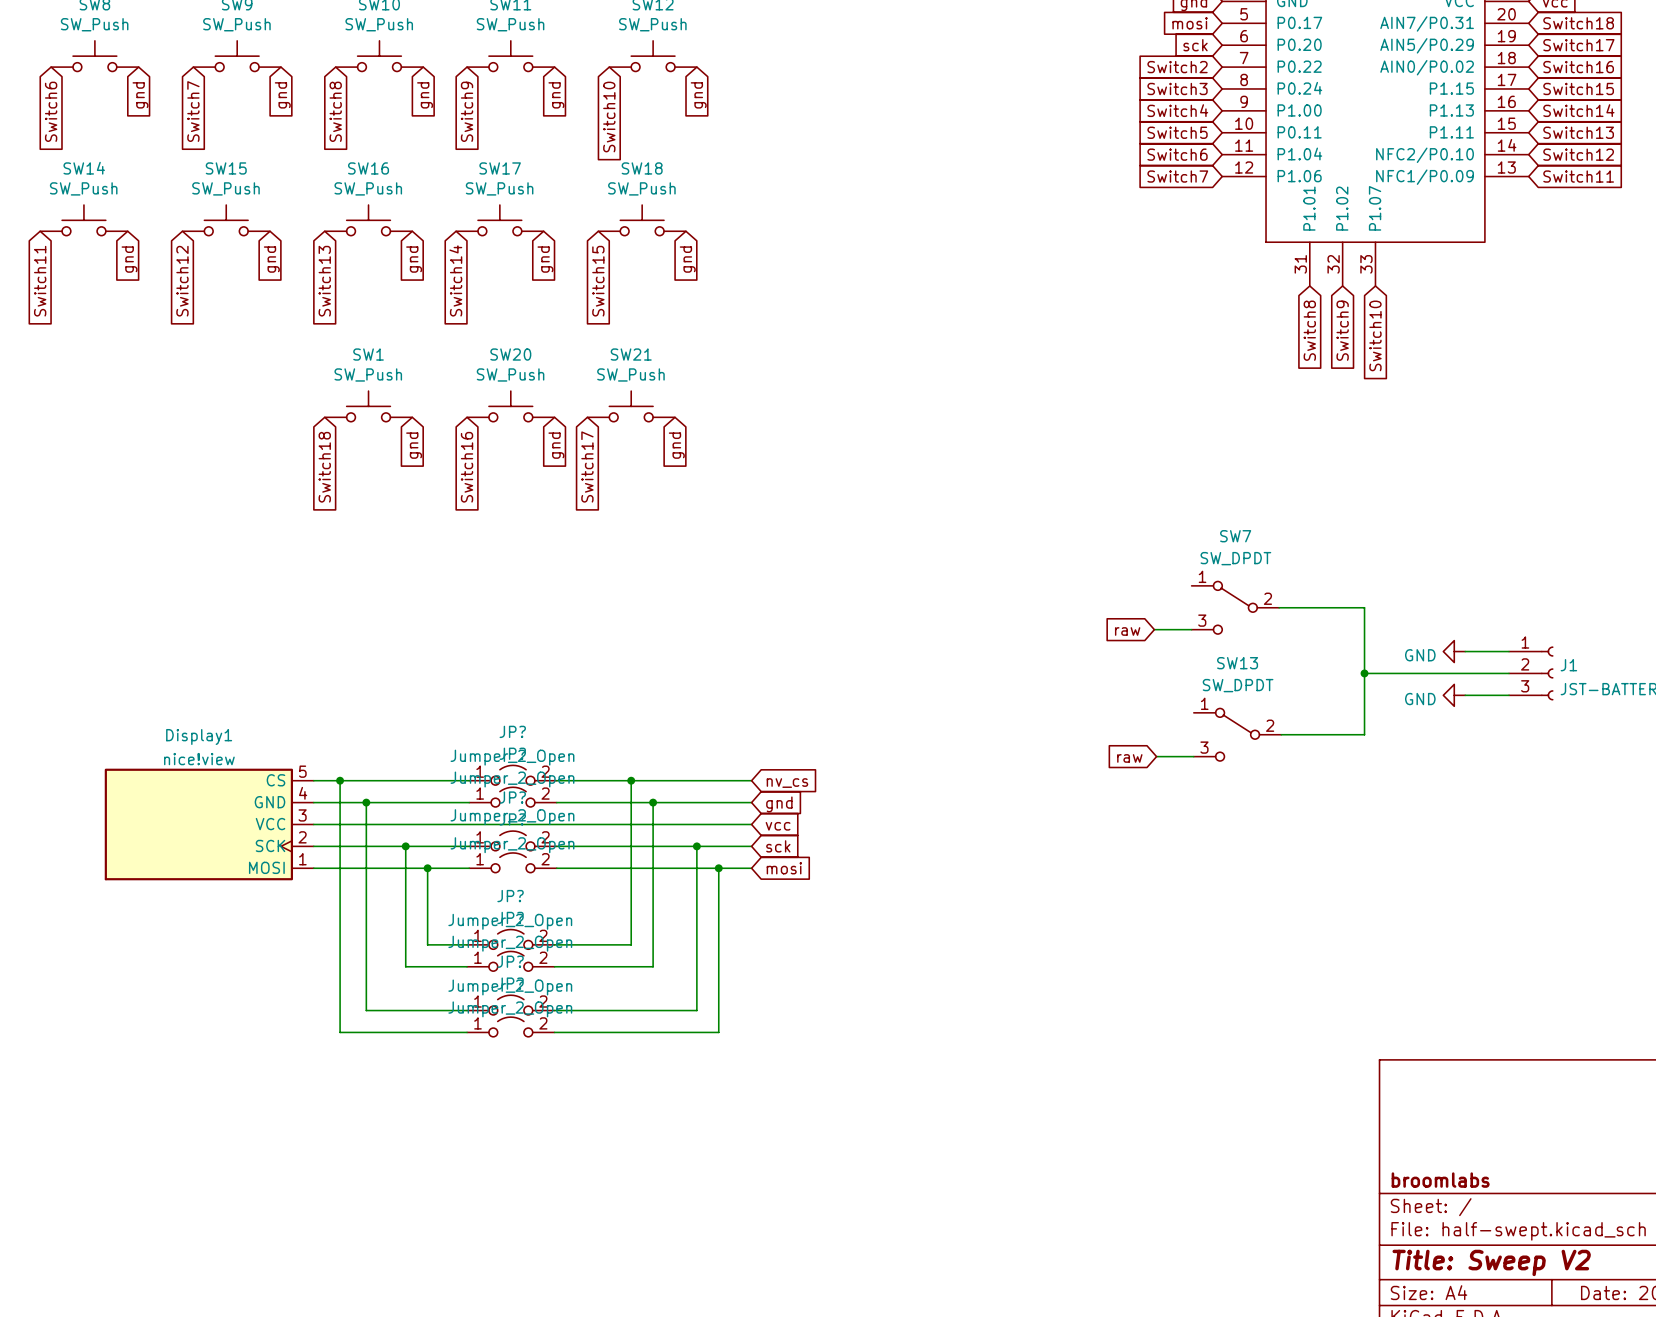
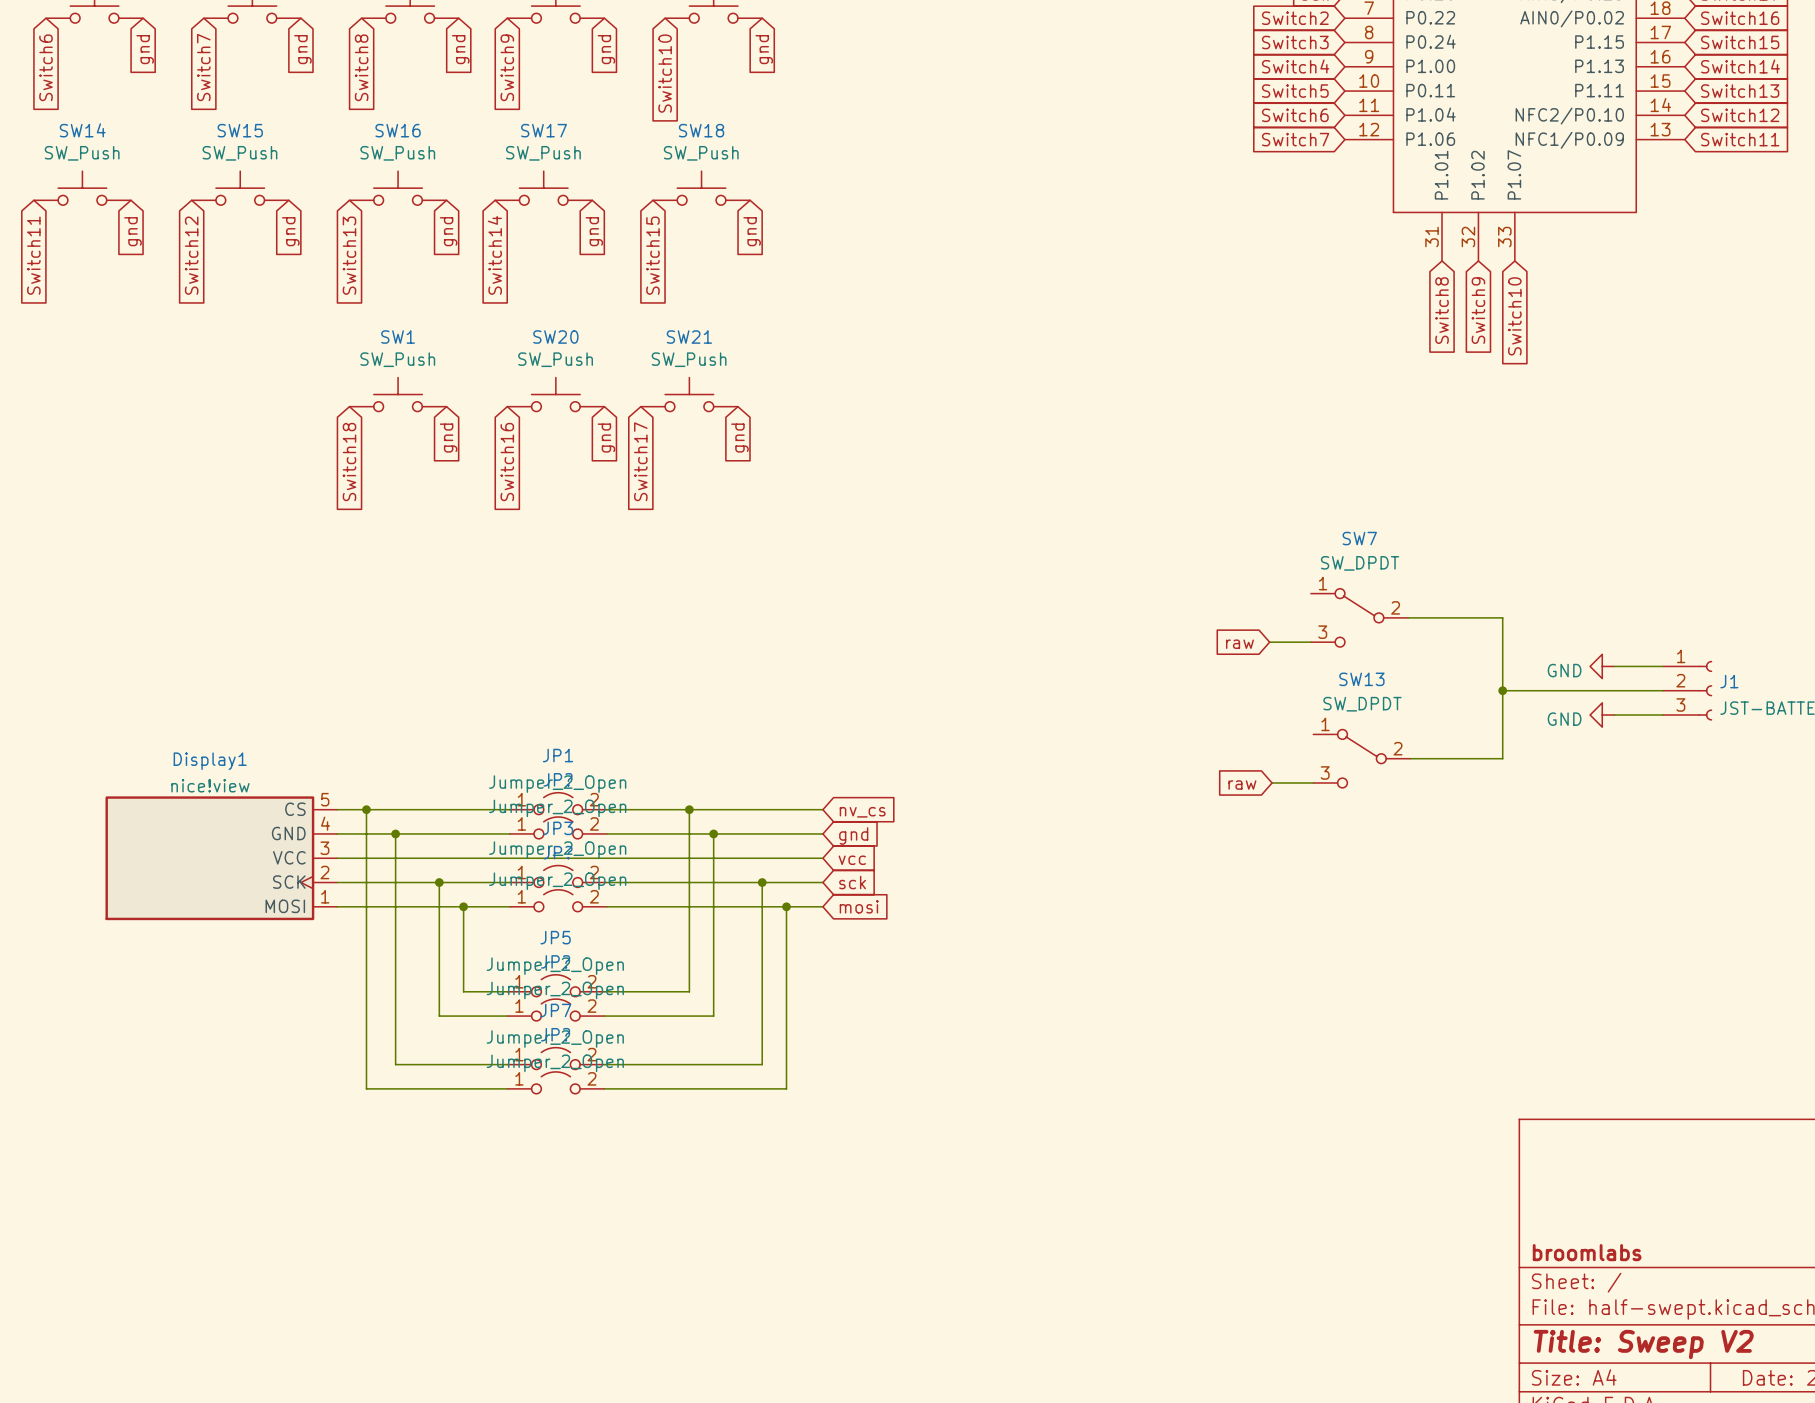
JP? name: JP? (512, 731) -> JP1 (557, 755)
JP? name: JP? (512, 797) -> JP3 (557, 828)
JP? name: JP? (510, 896) -> JP5 (555, 937)
JP? name: JP? (510, 961) -> JP7 (555, 1010)

